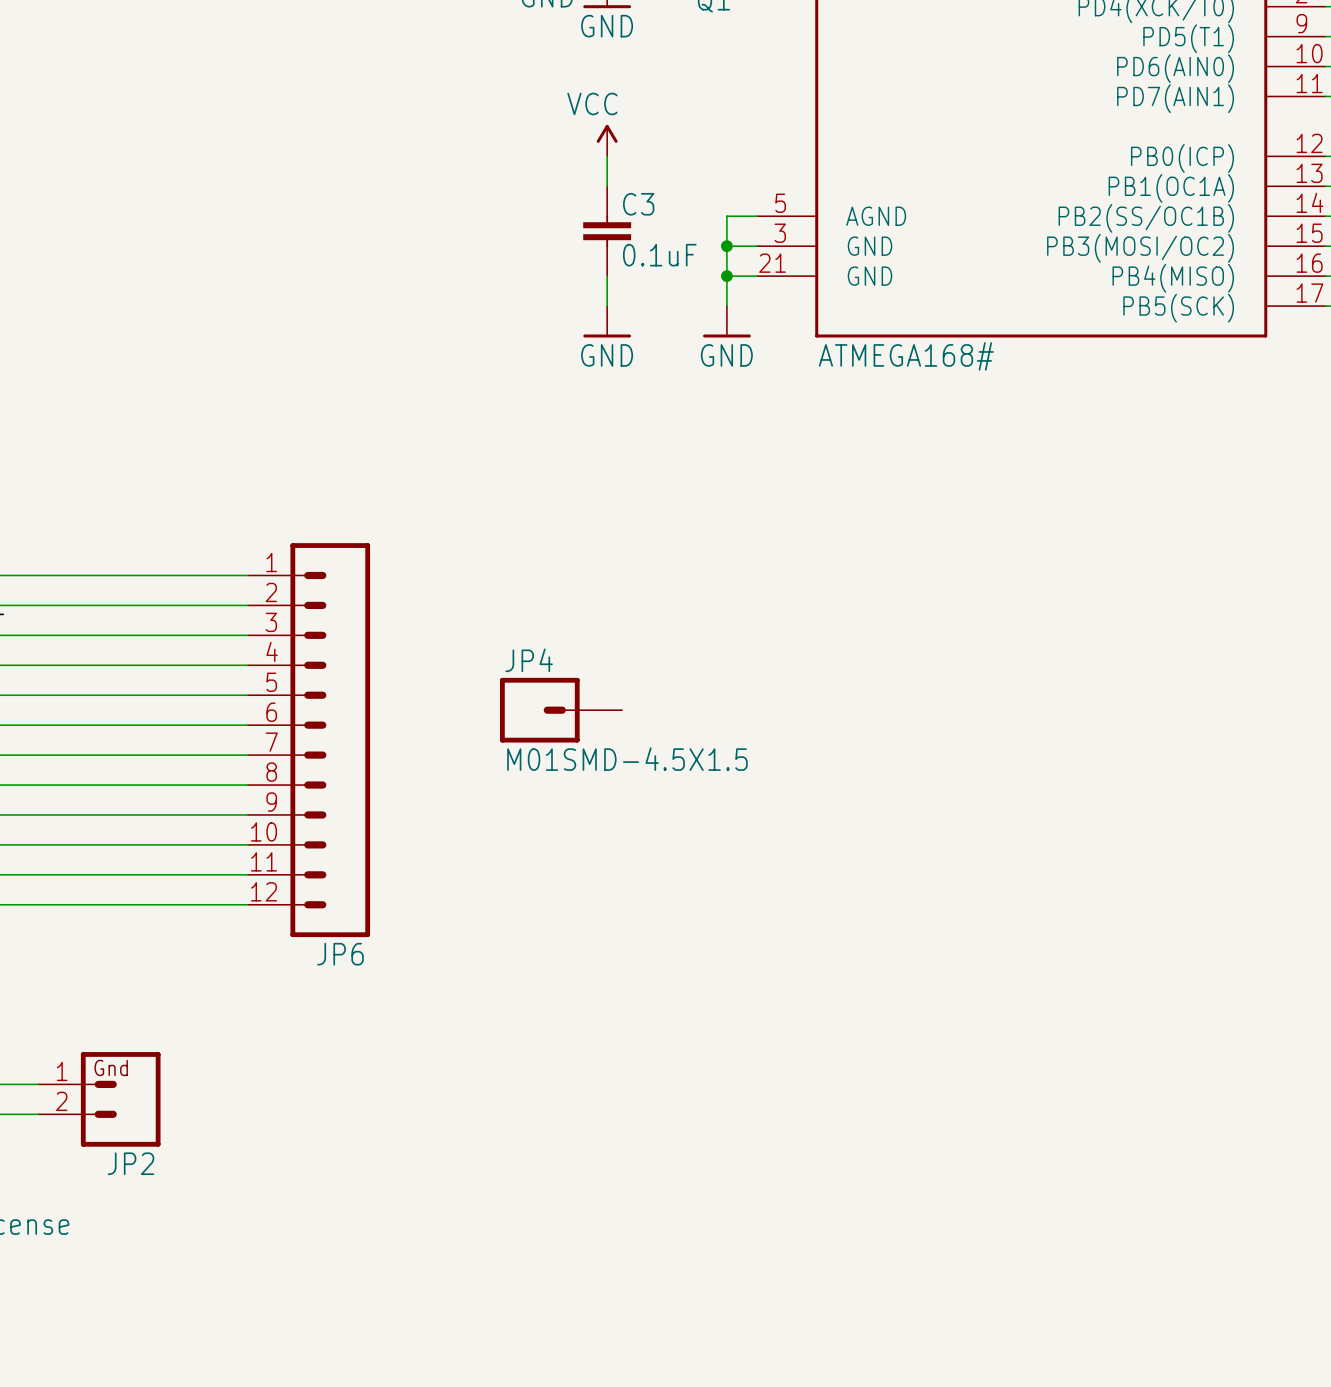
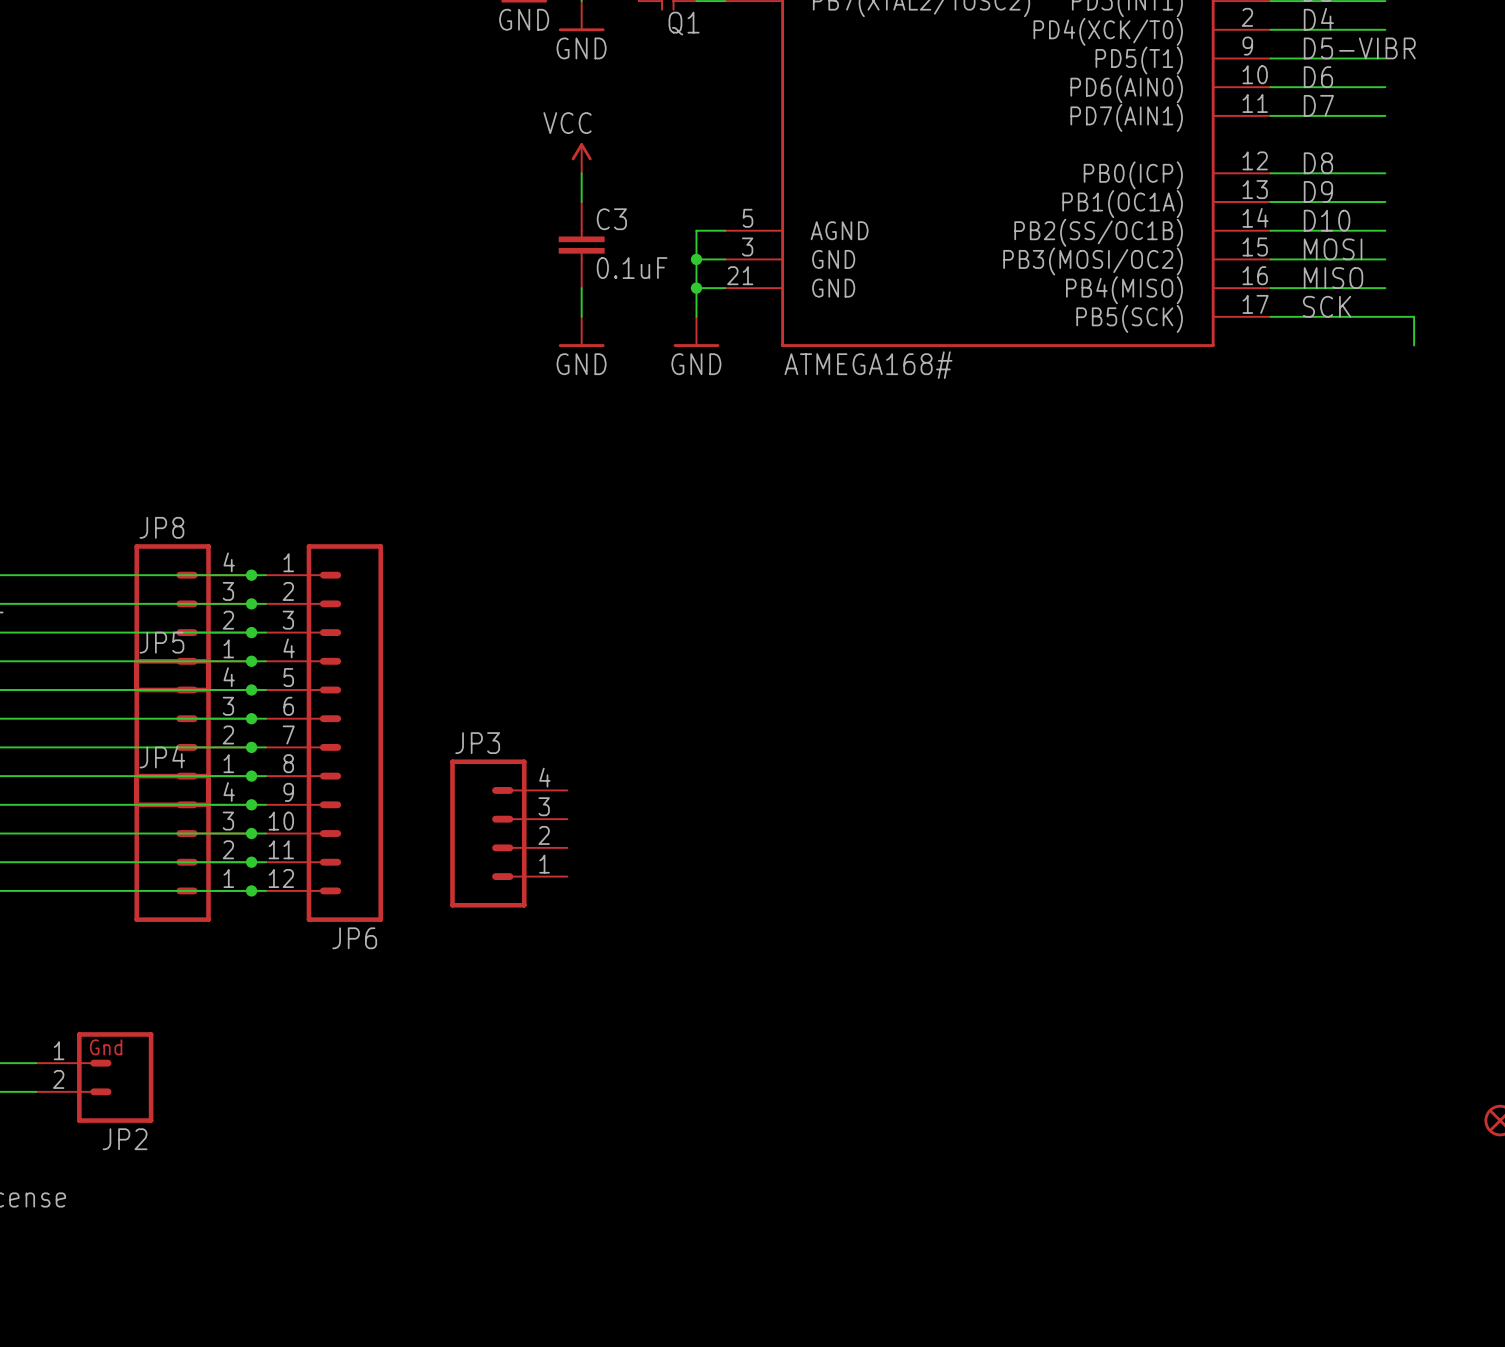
junction: none -> (251, 575)
junction: none -> (251, 603)
JP8: none -> (193, 618)
junction: none -> (251, 632)
JP4 name position: JP4 (529, 660) -> JP4 (162, 756)
junction: none -> (251, 661)
JP4 symbol: [500, 677, 623, 743] -> [134, 773, 252, 922]
junction: none -> (251, 689)
junction: none -> (251, 718)
JP5: none -> (193, 733)
JP6 position: (309, 740) -> (324, 733)
junction: none -> (251, 747)
JP4 value: M01SMD-4.5X1.5 (627, 759) -> none
junction: none -> (251, 776)
junction: none -> (251, 804)
junction: none -> (251, 833)
JP3: none -> (508, 833)
junction: none -> (251, 862)
junction: none -> (251, 890)

